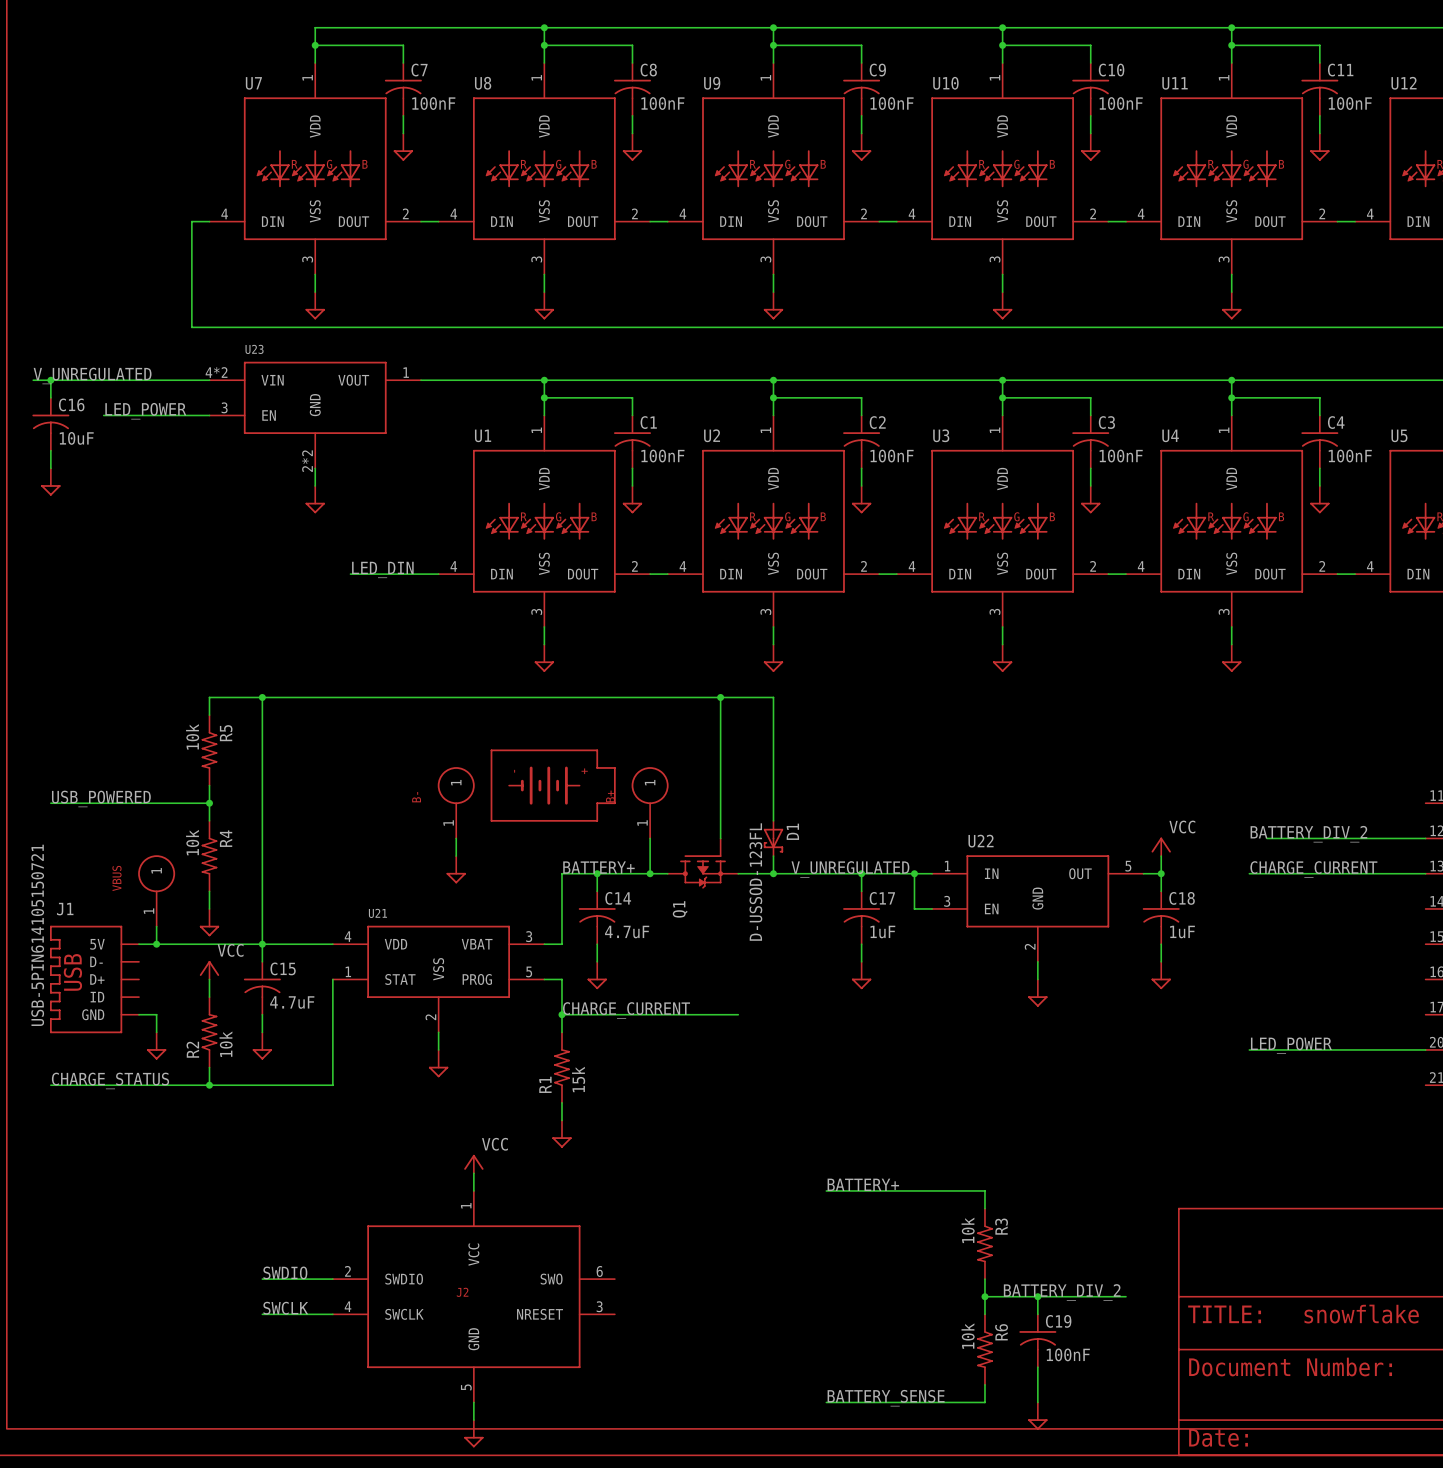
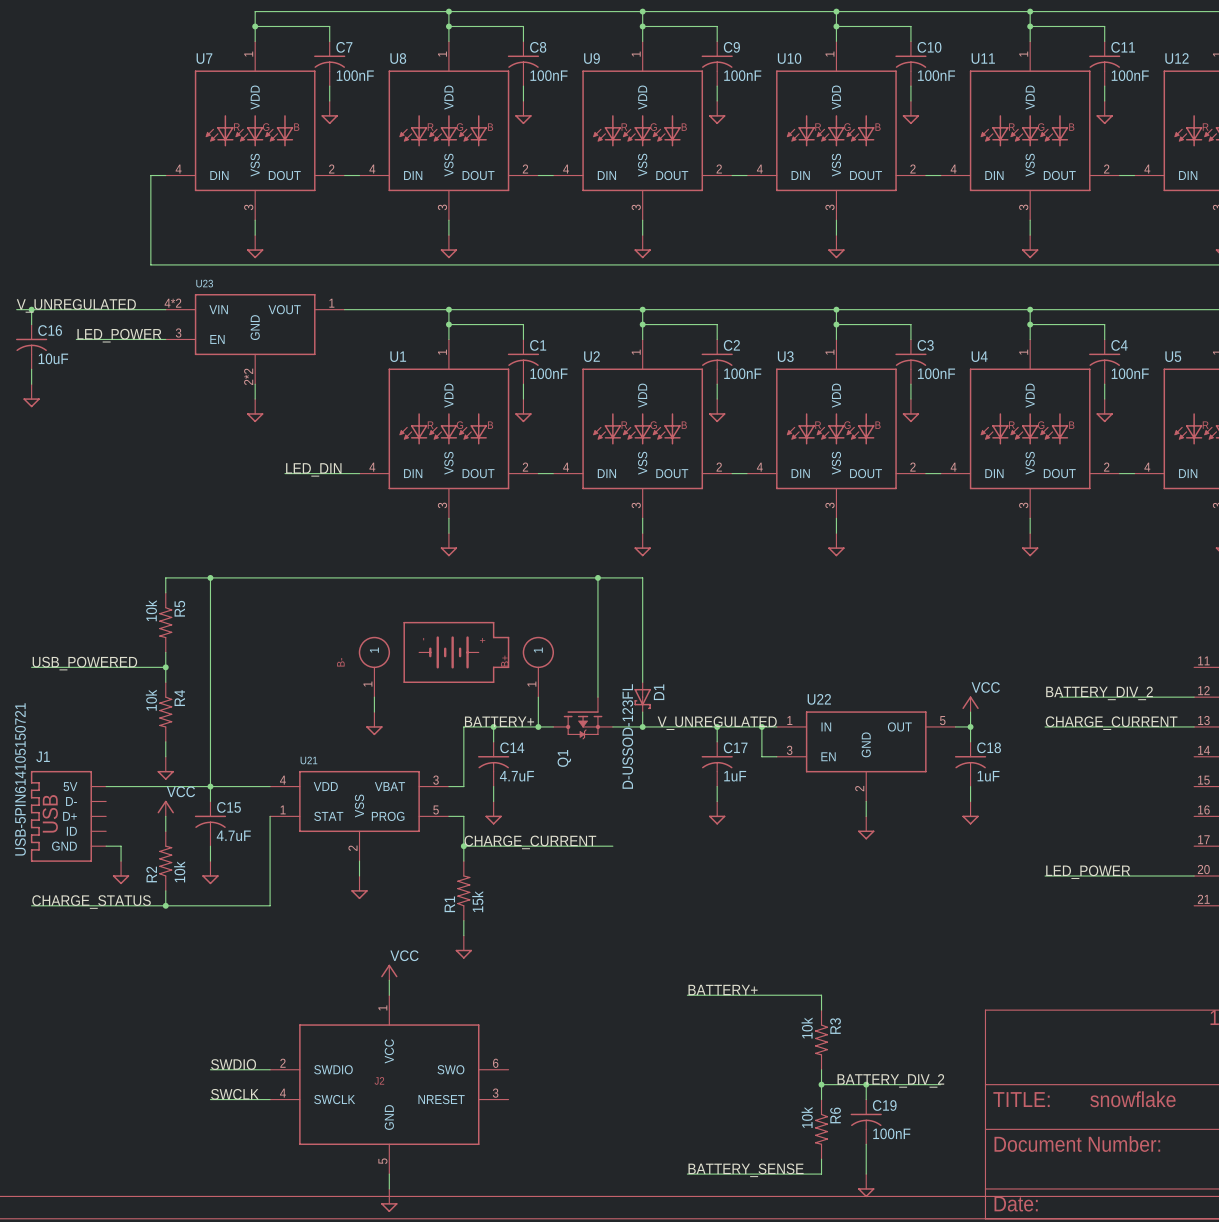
VBUS: (156, 890) -> none
wire: (156, 926) (156, 944) -> none
junction: (156, 944) -> none

